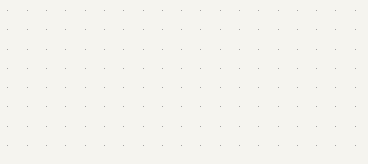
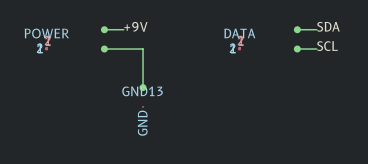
label: none -> +9V (135, 26)
label: none -> SDA (328, 26)
wire: none -> (104, 29) (123, 29)
junction: none -> (104, 29)
wire: none -> (297, 29) (316, 29)
junction: none -> (297, 29)
label: none -> SCL (327, 46)
POWER: none -> (46, 48)
DATA: none -> (239, 48)
wire: none -> (104, 49) (143, 49) (143, 87)
junction: none -> (104, 49)
wire: none -> (297, 49) (316, 49)
junction: none -> (297, 49)
junction: none -> (143, 87)
GND13: none -> (143, 106)

